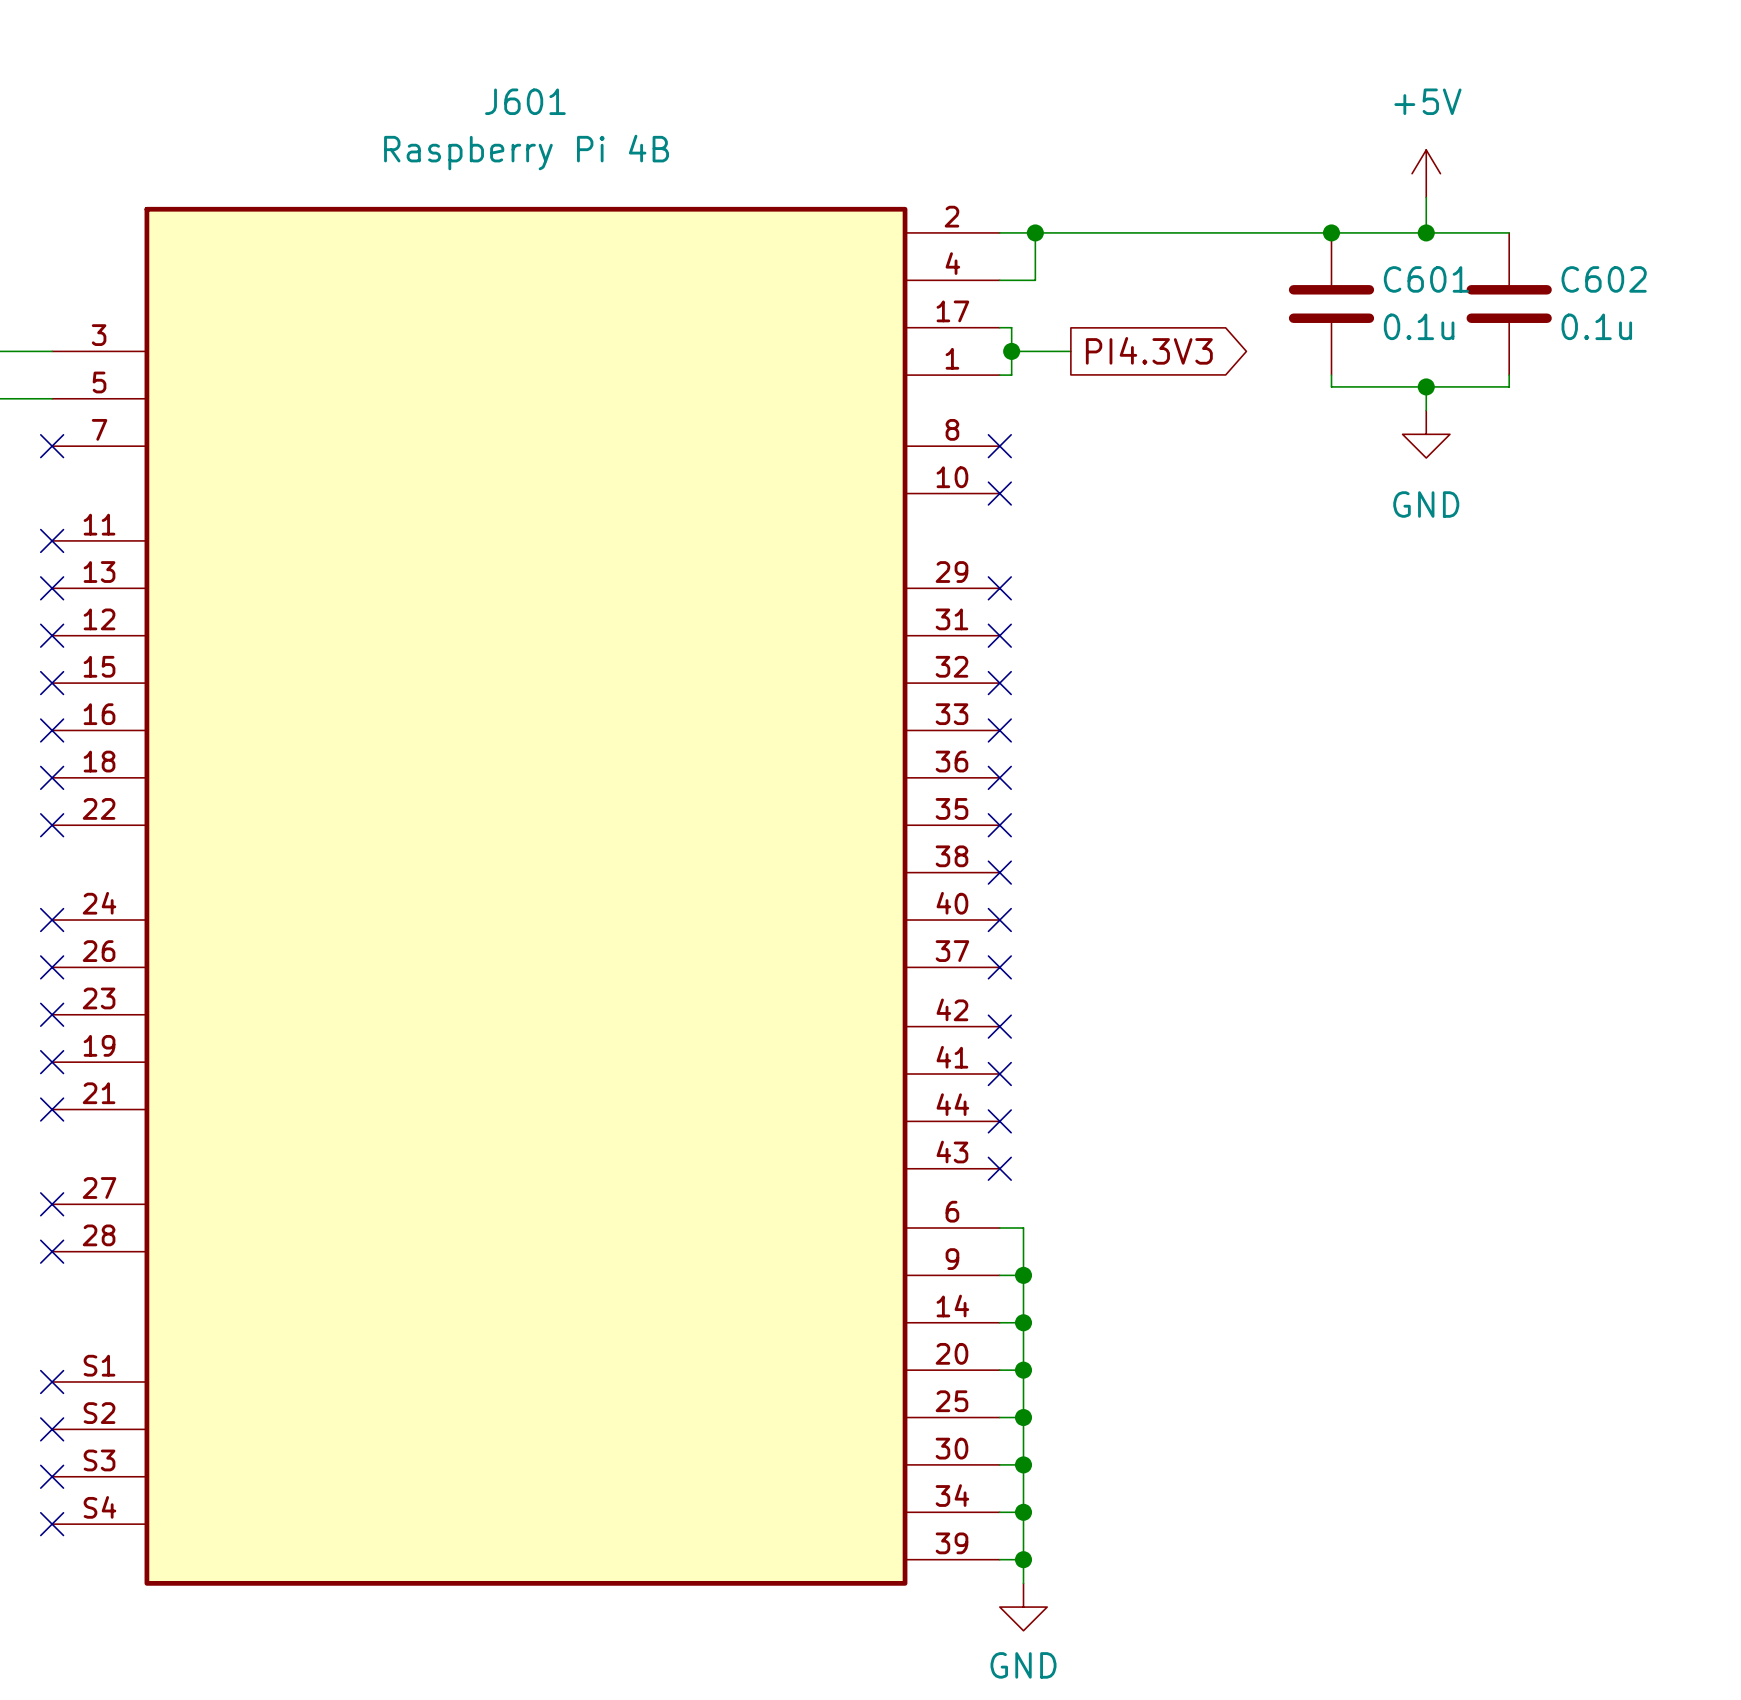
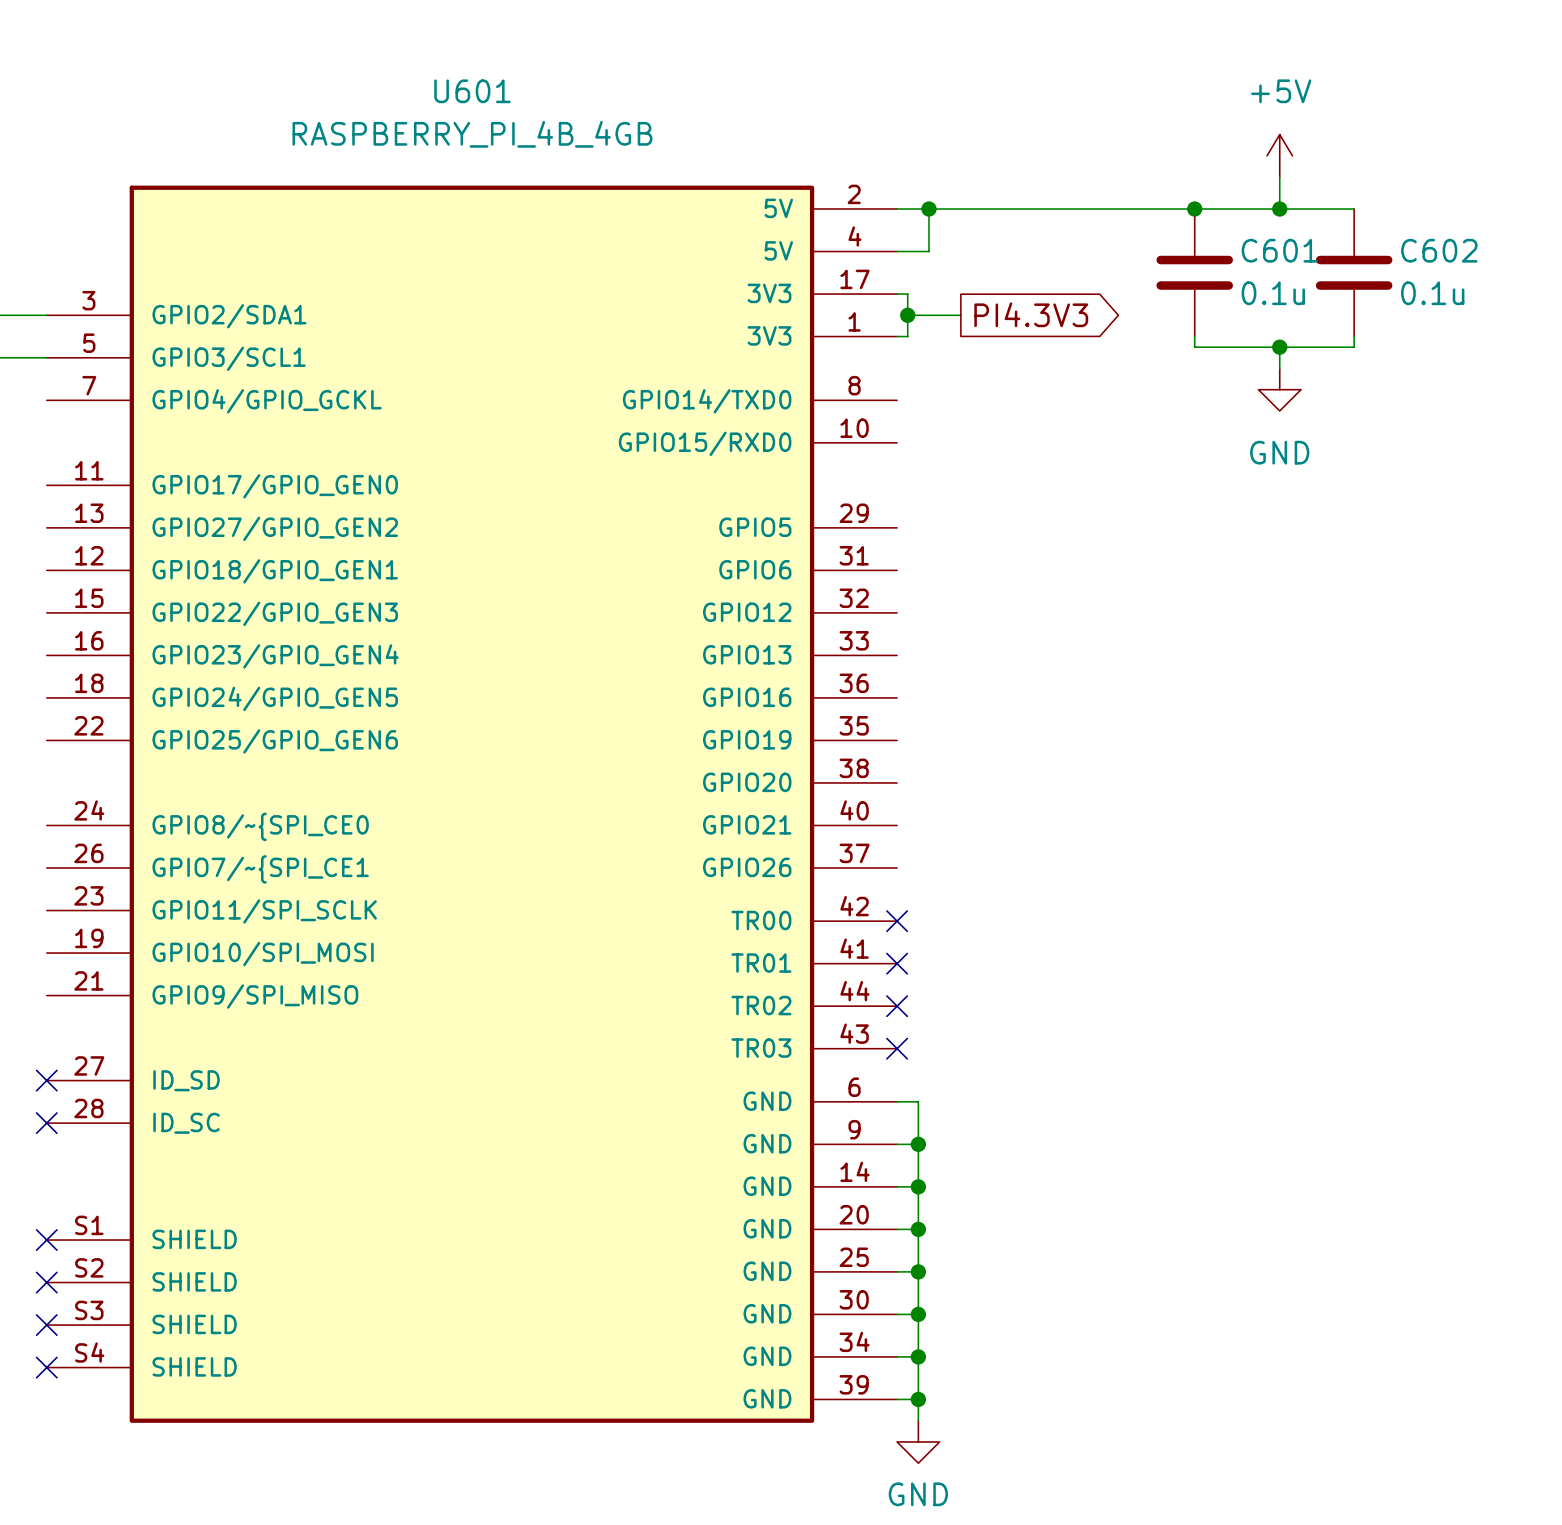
J601 name: J601 (525, 101) -> U601 (472, 91)
J601 value: Raspberry Pi 4B (526, 152) -> RASPBERRY_PI_4B_4GB (472, 134)
J601 symbol: [52, 206, 1000, 1586] -> [46, 185, 898, 1423]
no-connect mark: (52, 446) -> none
no-connect mark: (999, 446) -> none
no-connect mark: (999, 493) -> none
no-connect mark: (52, 540) -> none
no-connect mark: (52, 588) -> none
no-connect mark: (999, 588) -> none
no-connect mark: (52, 635) -> none
no-connect mark: (999, 635) -> none
no-connect mark: (52, 683) -> none
no-connect mark: (999, 683) -> none
no-connect mark: (52, 730) -> none
no-connect mark: (999, 730) -> none
no-connect mark: (52, 777) -> none
no-connect mark: (999, 777) -> none
no-connect mark: (52, 825) -> none
no-connect mark: (999, 825) -> none
no-connect mark: (999, 872) -> none
no-connect mark: (52, 920) -> none
no-connect mark: (999, 920) -> none
no-connect mark: (52, 967) -> none
no-connect mark: (999, 967) -> none
no-connect mark: (52, 1014) -> none
no-connect mark: (52, 1062) -> none
no-connect mark: (52, 1109) -> none

